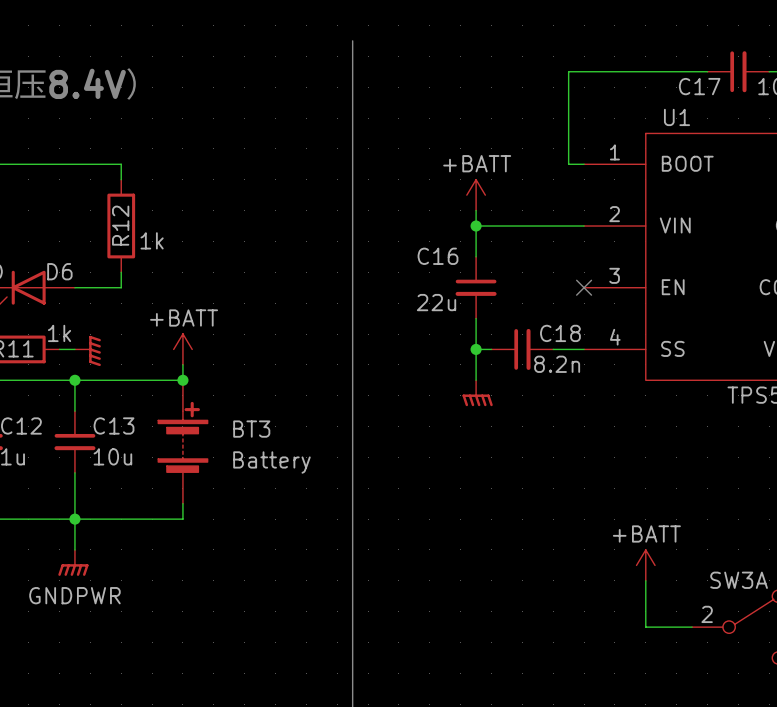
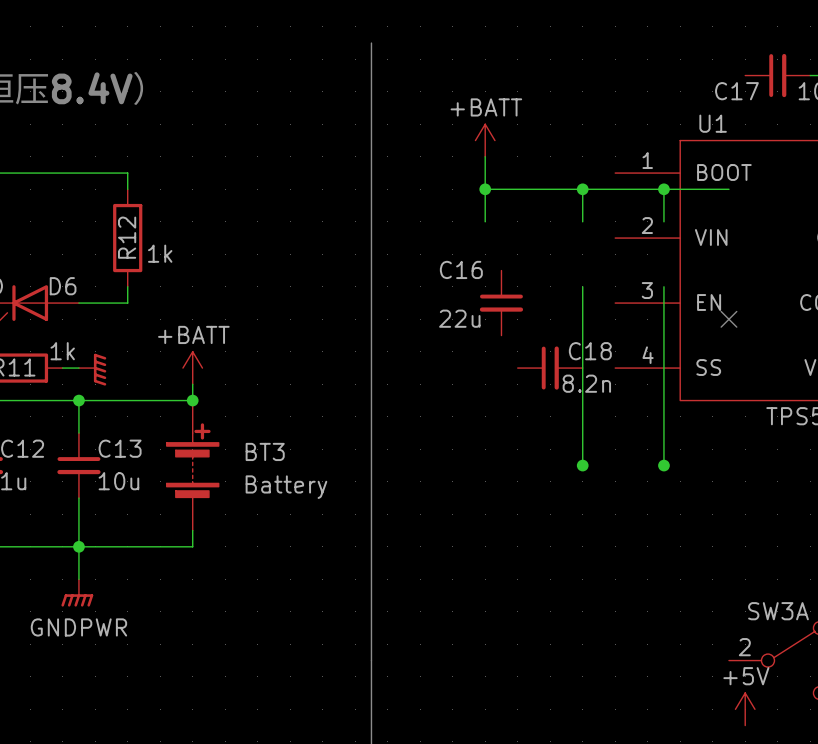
wire: (707, 71) (568, 71) (568, 164) (584, 164) -> none
wire: none -> (485, 189) (728, 189)
junction: none -> (485, 189)
wire: none -> (582, 189) (582, 221)
junction: none -> (582, 189)
wire: none -> (663, 189) (663, 221)
junction: none -> (663, 189)
power symbol position: +BATT (476, 195) -> +BATT (485, 140)
wire: (476, 210) (476, 256) -> none
wire: (476, 226) (584, 226) -> none
junction: (476, 226) -> none
wire: none -> (582, 286) (582, 465)
wire: none -> (663, 286) (663, 465)
no-connect mark: (584, 287) -> none
no-connect mark: none -> (728, 319)
wire: (476, 318) (476, 380) -> (485, 156) (485, 221)
wire: (476, 349) (491, 349) -> none
junction: (476, 349) -> none
wire: (553, 349) (584, 349) -> none
power symbol: (477, 393) -> none
junction: none -> (582, 465)
junction: none -> (663, 465)
power symbol: +BATT (645, 565) -> none
wire: (645, 580) (645, 627) (692, 627) -> none
power symbol: none -> +5V (745, 709)

